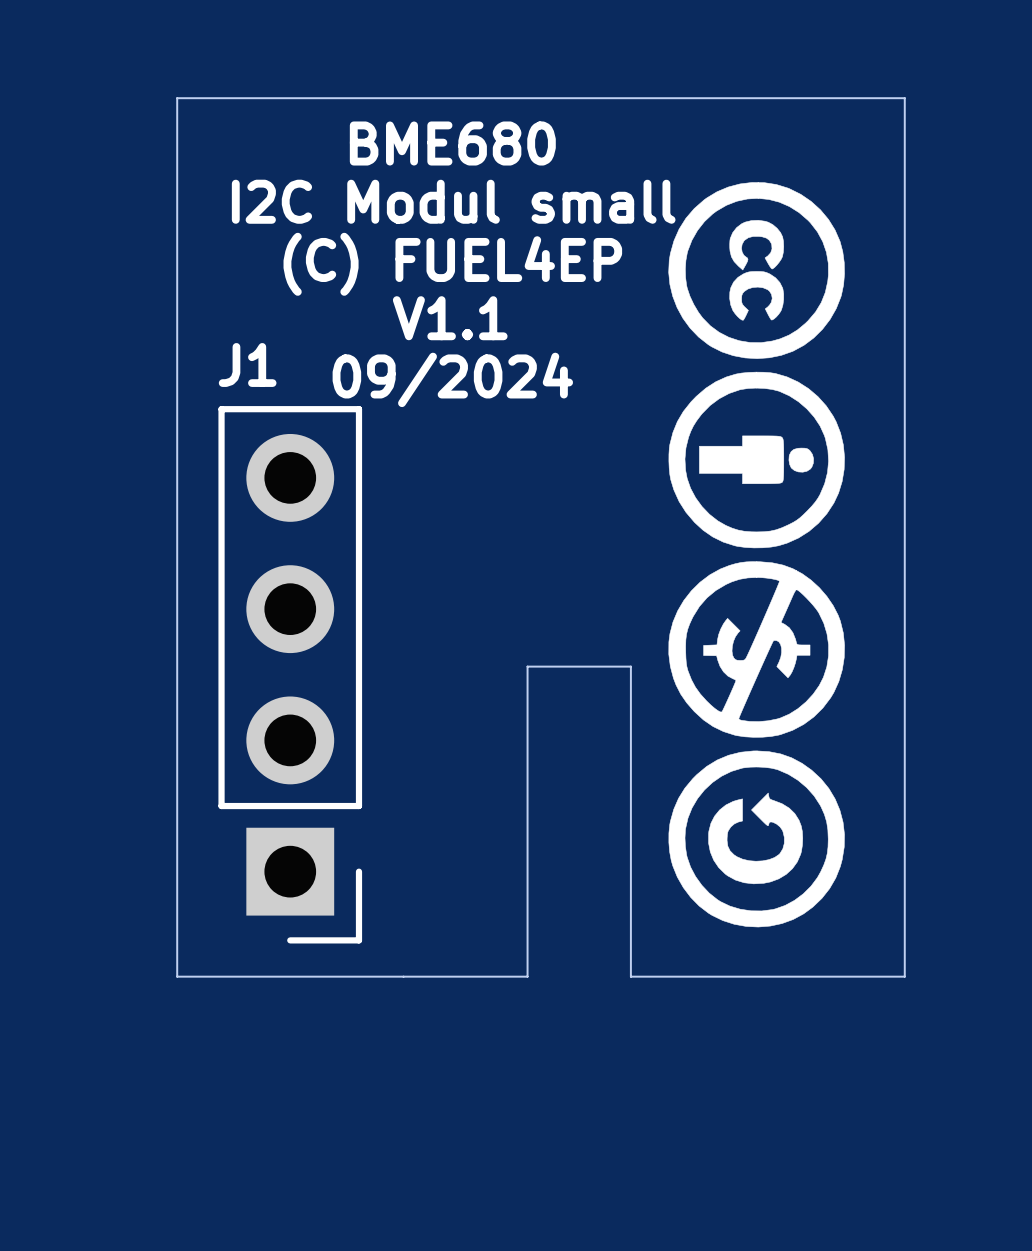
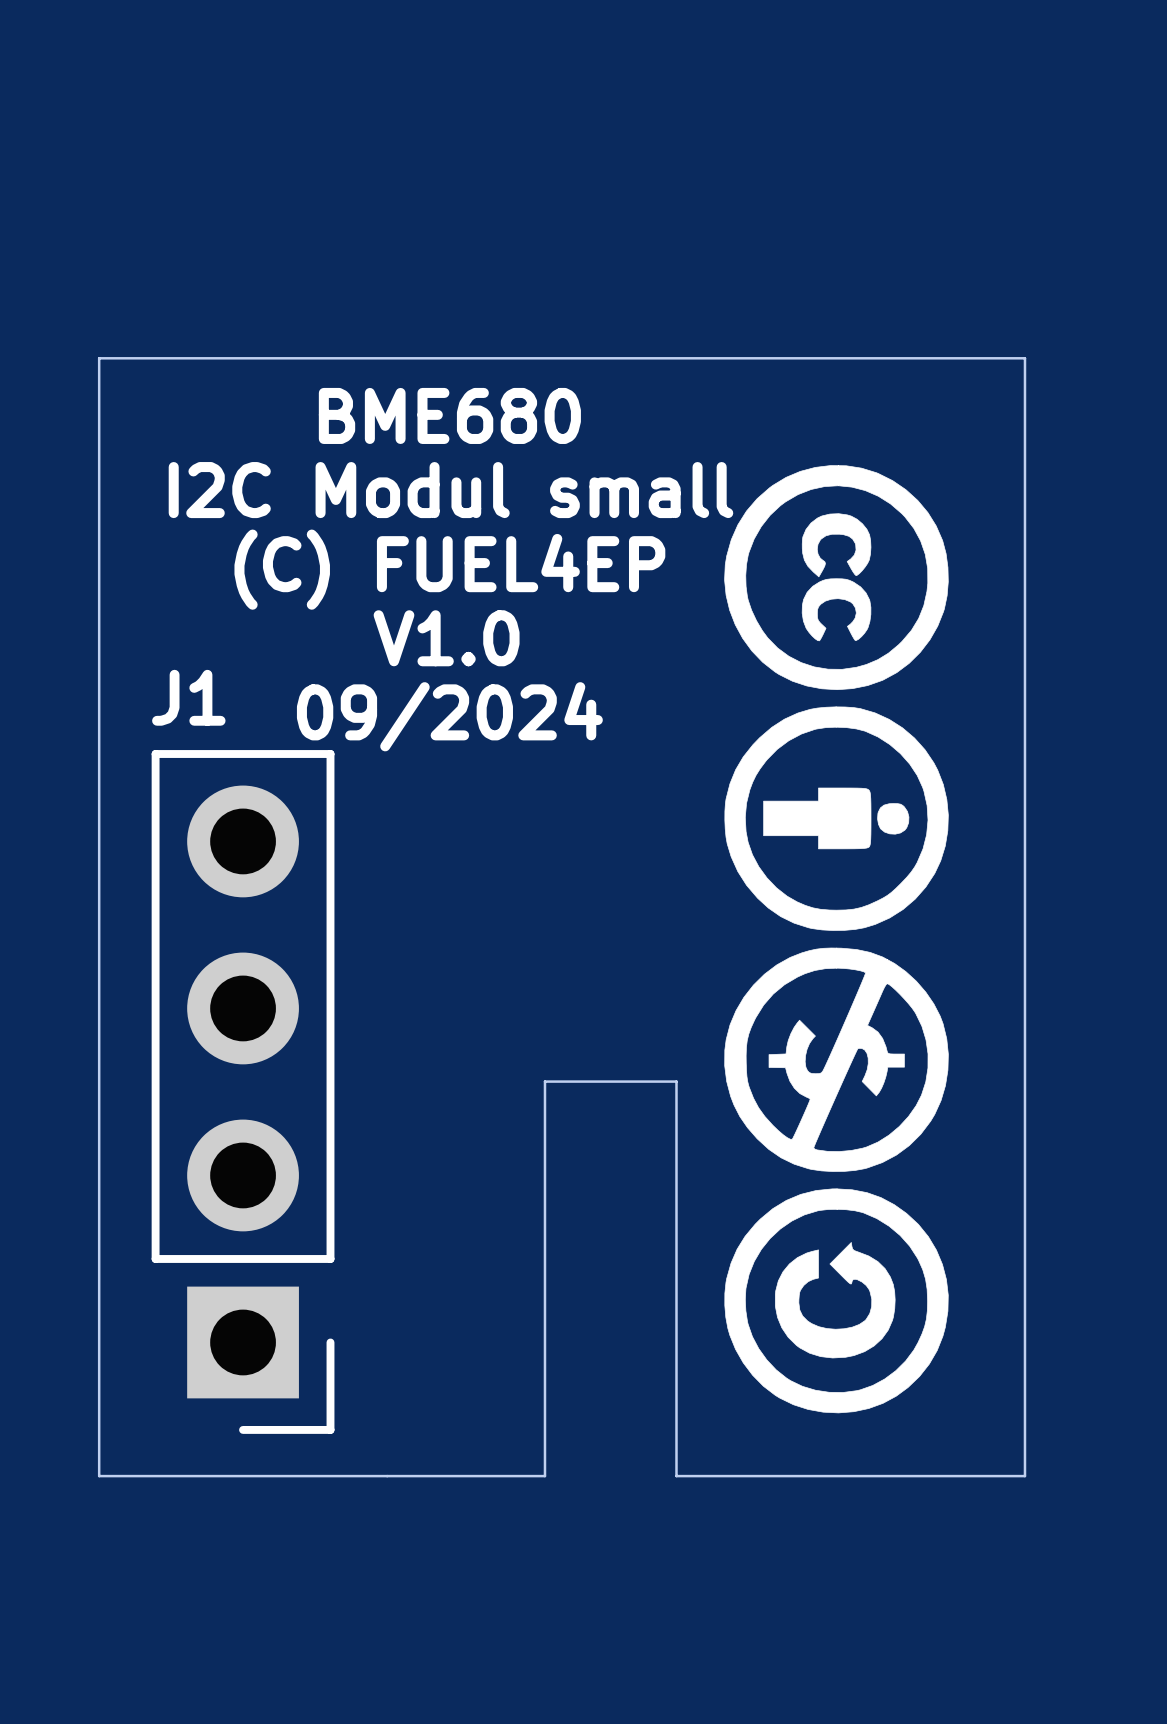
text: V1.1 (450, 318) -> V1.0 (446, 638)

